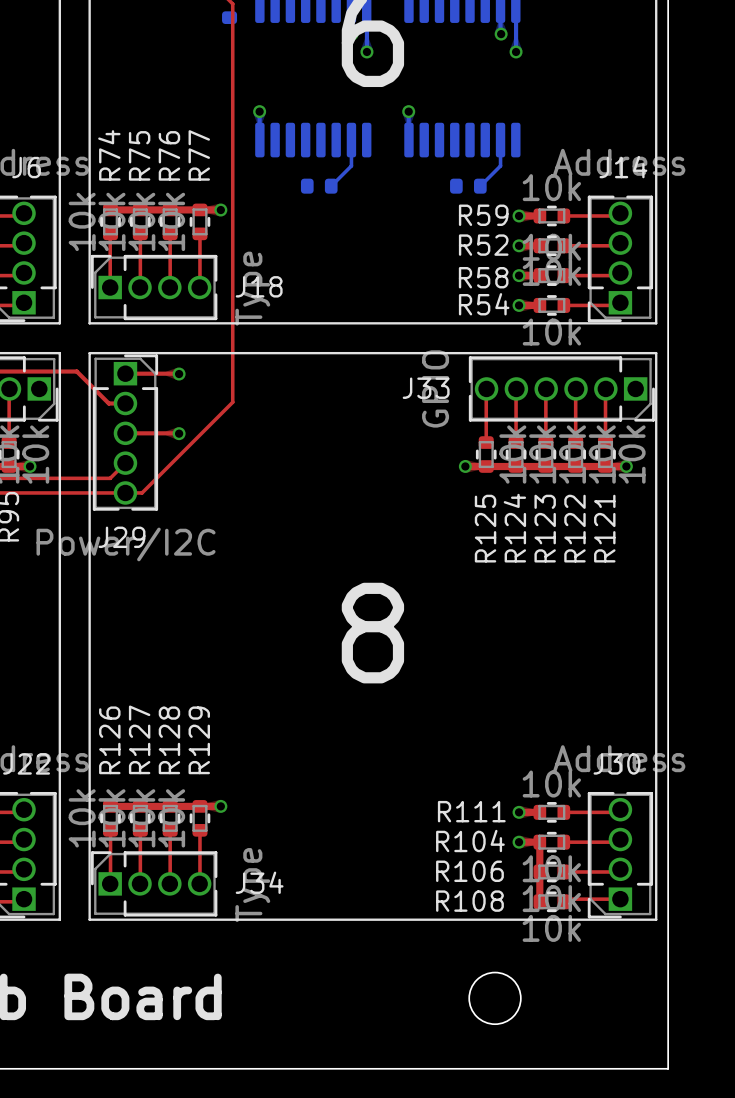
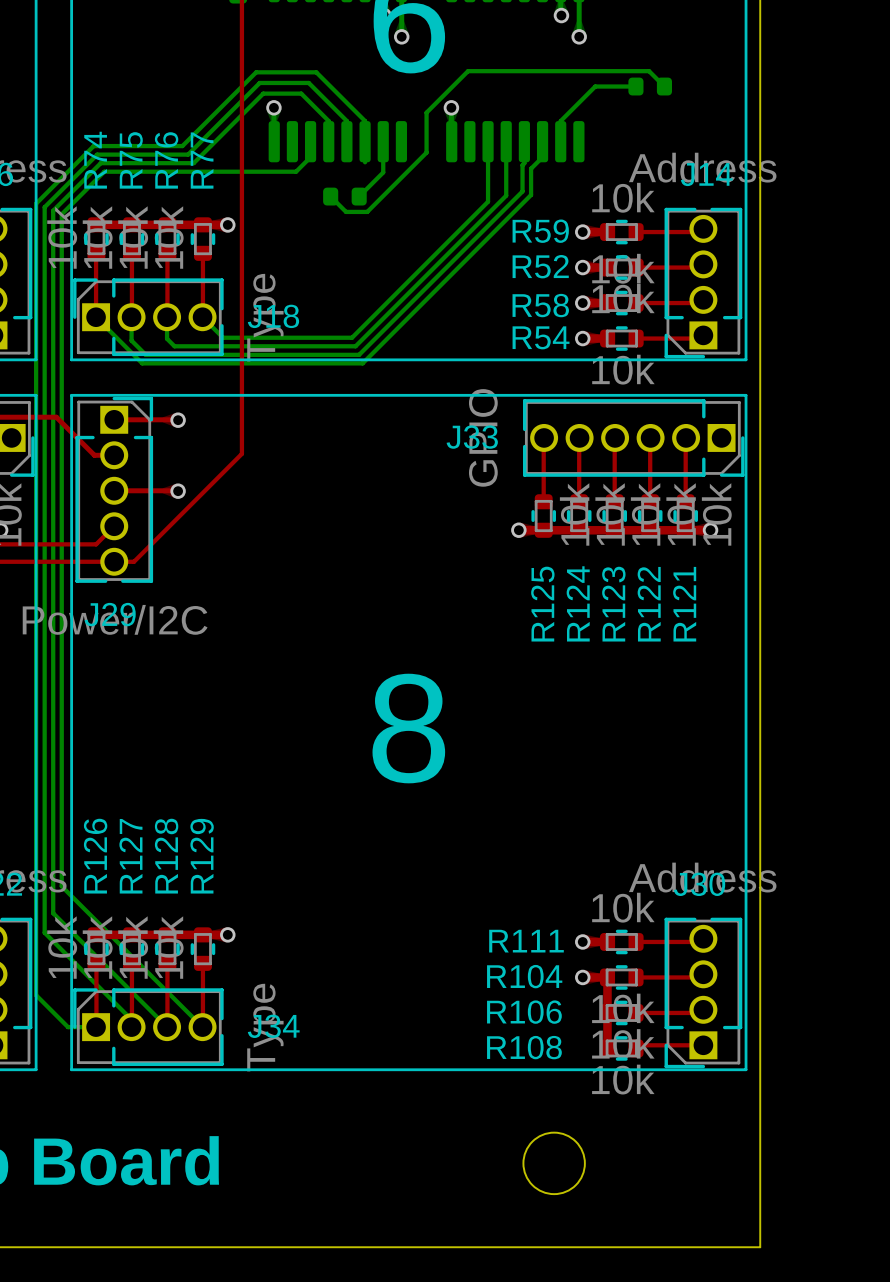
bottom track: none -> (664, 86) (649, 71) (468, 71) (426, 112) (426, 152) (367, 211) (346, 211) (330, 196)
bottom track: none -> (310, 141) (310, 157) (296, 171) (104, 171) (61, 214) (61, 886) (202, 1027)
bottom track: none -> (328, 141) (328, 121) (301, 93) (263, 93) (193, 163) (100, 163) (53, 210) (53, 913) (167, 1027)
bottom track: none -> (346, 141) (346, 121) (308, 82) (259, 82) (188, 154) (97, 154) (44, 207) (44, 932) (131, 1019) (131, 1027)
bottom track: none -> (488, 141) (488, 201) (352, 337) (223, 337) (202, 317)
bottom track: none -> (506, 141) (506, 195) (355, 346) (174, 346) (167, 338) (167, 317)
bottom track: none -> (524, 141) (522, 191) (359, 354) (145, 354) (131, 340) (131, 317)
bottom track: none -> (542, 141) (542, 157) (531, 168) (531, 194) (362, 363) (142, 363) (96, 317)
bottom track: (500, 140) (500, 165) (480, 186) -> (560, 141) (560, 121) (595, 86) (635, 86)
bottom track: none -> (365, 162) (365, 121) (316, 72) (256, 72) (182, 146) (93, 146) (36, 203) (36, 995) (68, 1027) (96, 1027)
part position: (468, 186) -> (650, 86)

